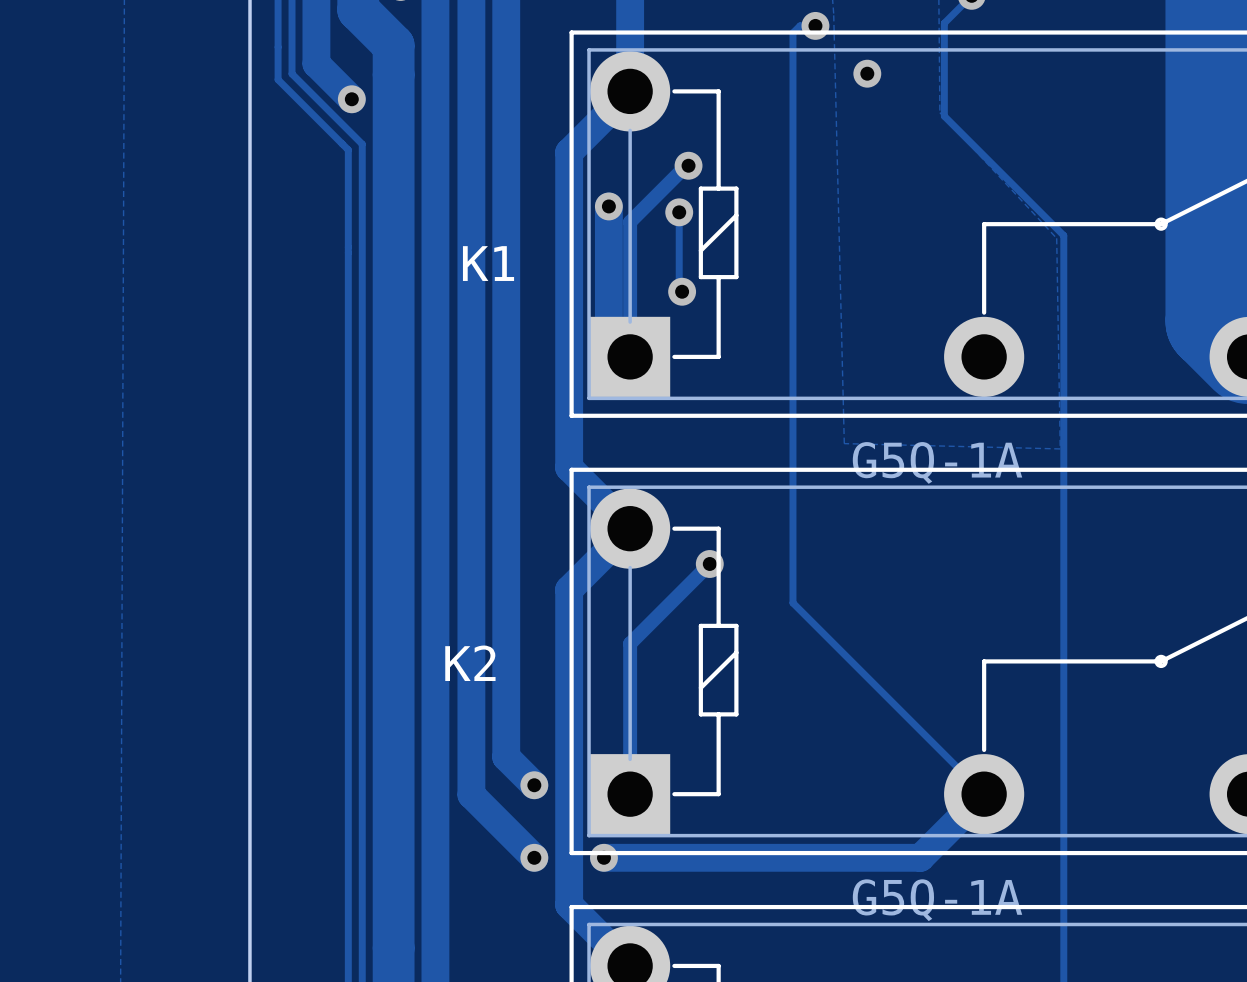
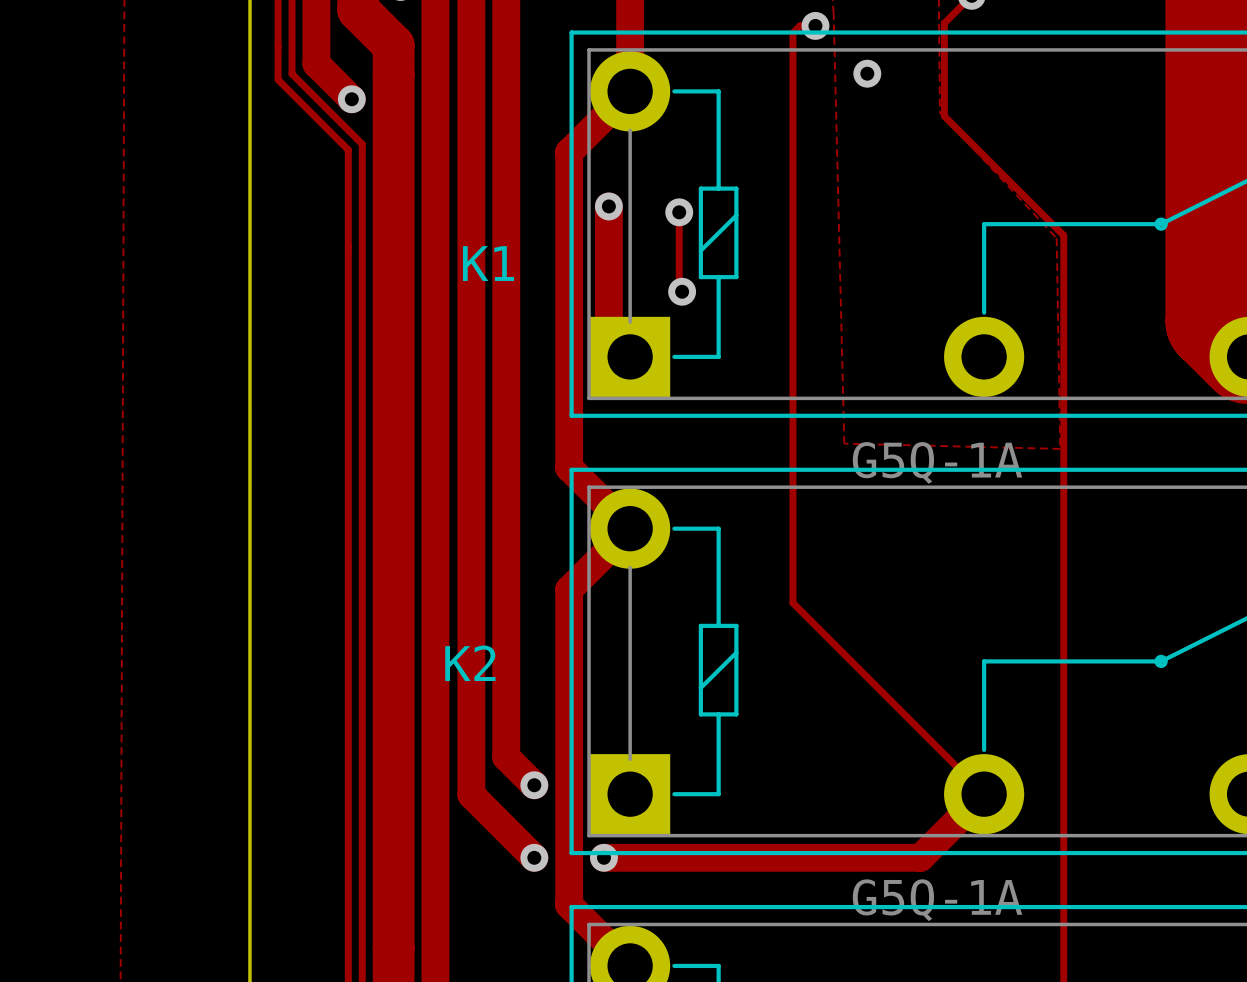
track: (688, 165) (630, 222) (630, 356) -> none
via: (688, 165) -> none
track: (709, 563) (630, 643) (630, 794) -> none
via: (709, 563) -> none

